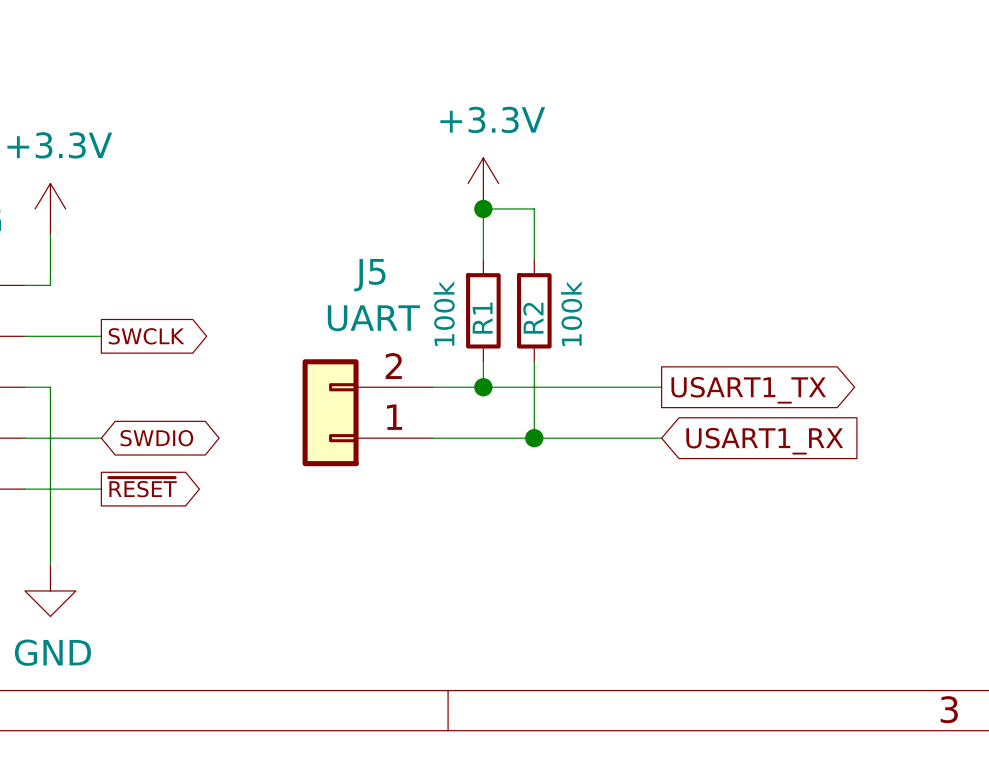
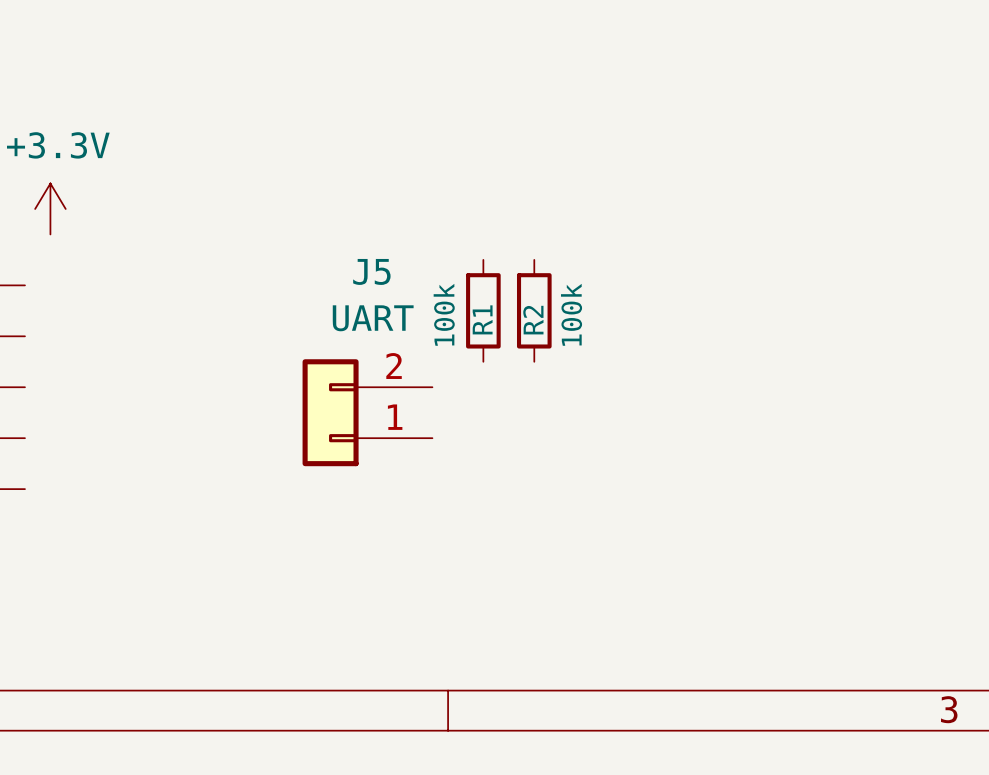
power symbol: +3.3V (483, 183) -> none
junction: (483, 208) -> none
wire: (50, 234) (50, 285) (24, 285) -> none
wire: (483, 259) (483, 208) (534, 208) (534, 259) -> none
wire: (24, 336) (101, 336) -> none
global label: SWCLK (146, 336) -> none
wire: (483, 361) (483, 387) -> none
wire: (534, 361) (534, 438) -> none
wire: (24, 387) (50, 387) (50, 565) -> none
wire: (432, 387) (661, 387) -> none
junction: (483, 387) -> none
global label: USART1_TX (748, 390) -> none
wire: (24, 438) (101, 438) -> none
global label: SWDIO (156, 438) -> none
wire: (432, 438) (661, 438) -> none
junction: (534, 438) -> none
global label: USART1_RX (764, 441) -> none
global label: ~{RESET} (142, 487) -> none
wire: (24, 489) (101, 489) -> none
power symbol: GND (50, 590) -> none

